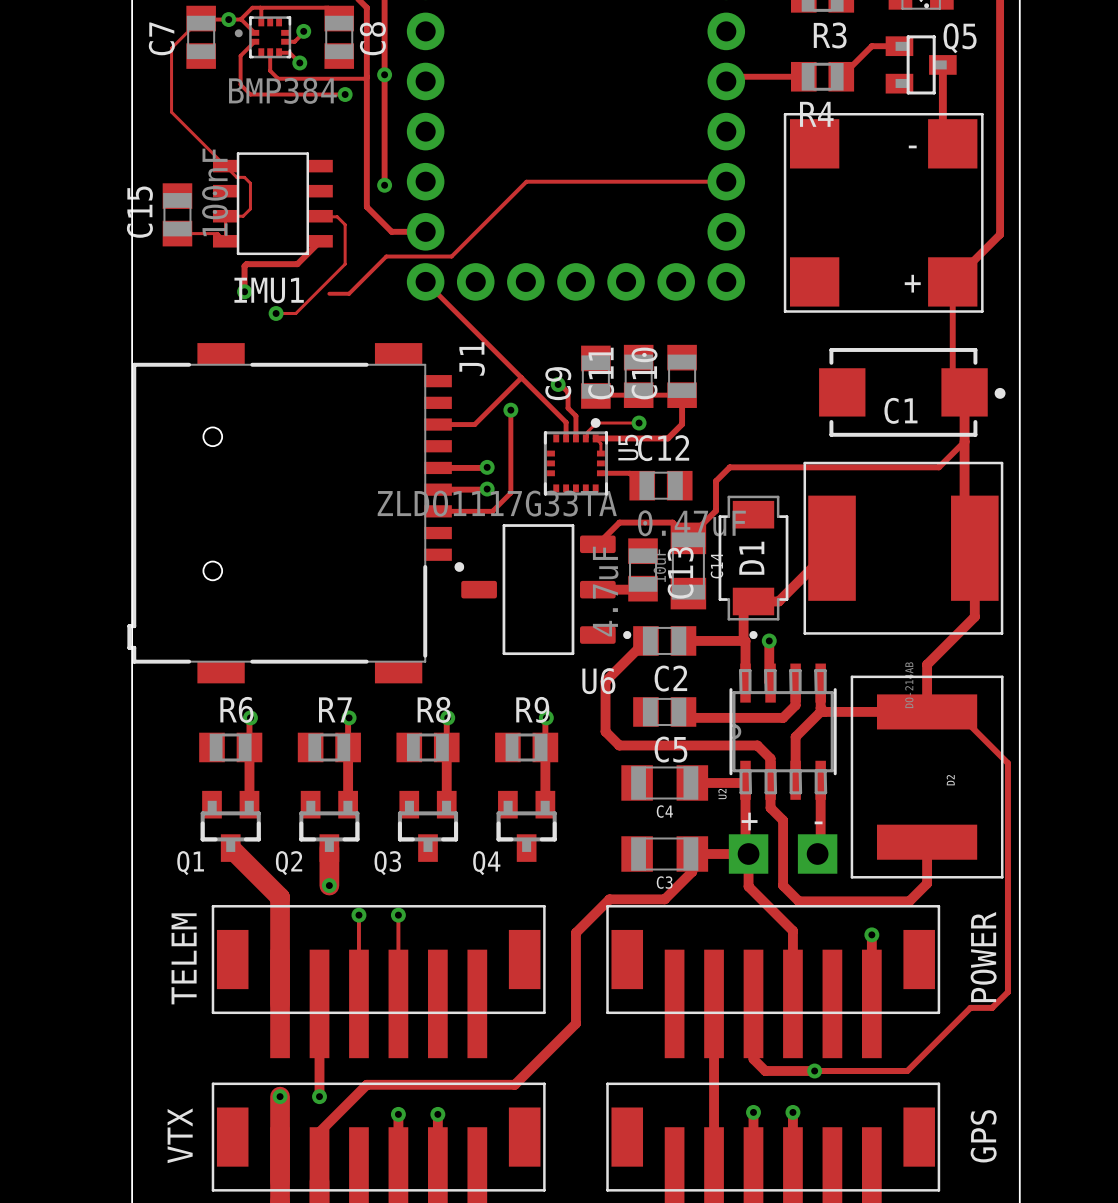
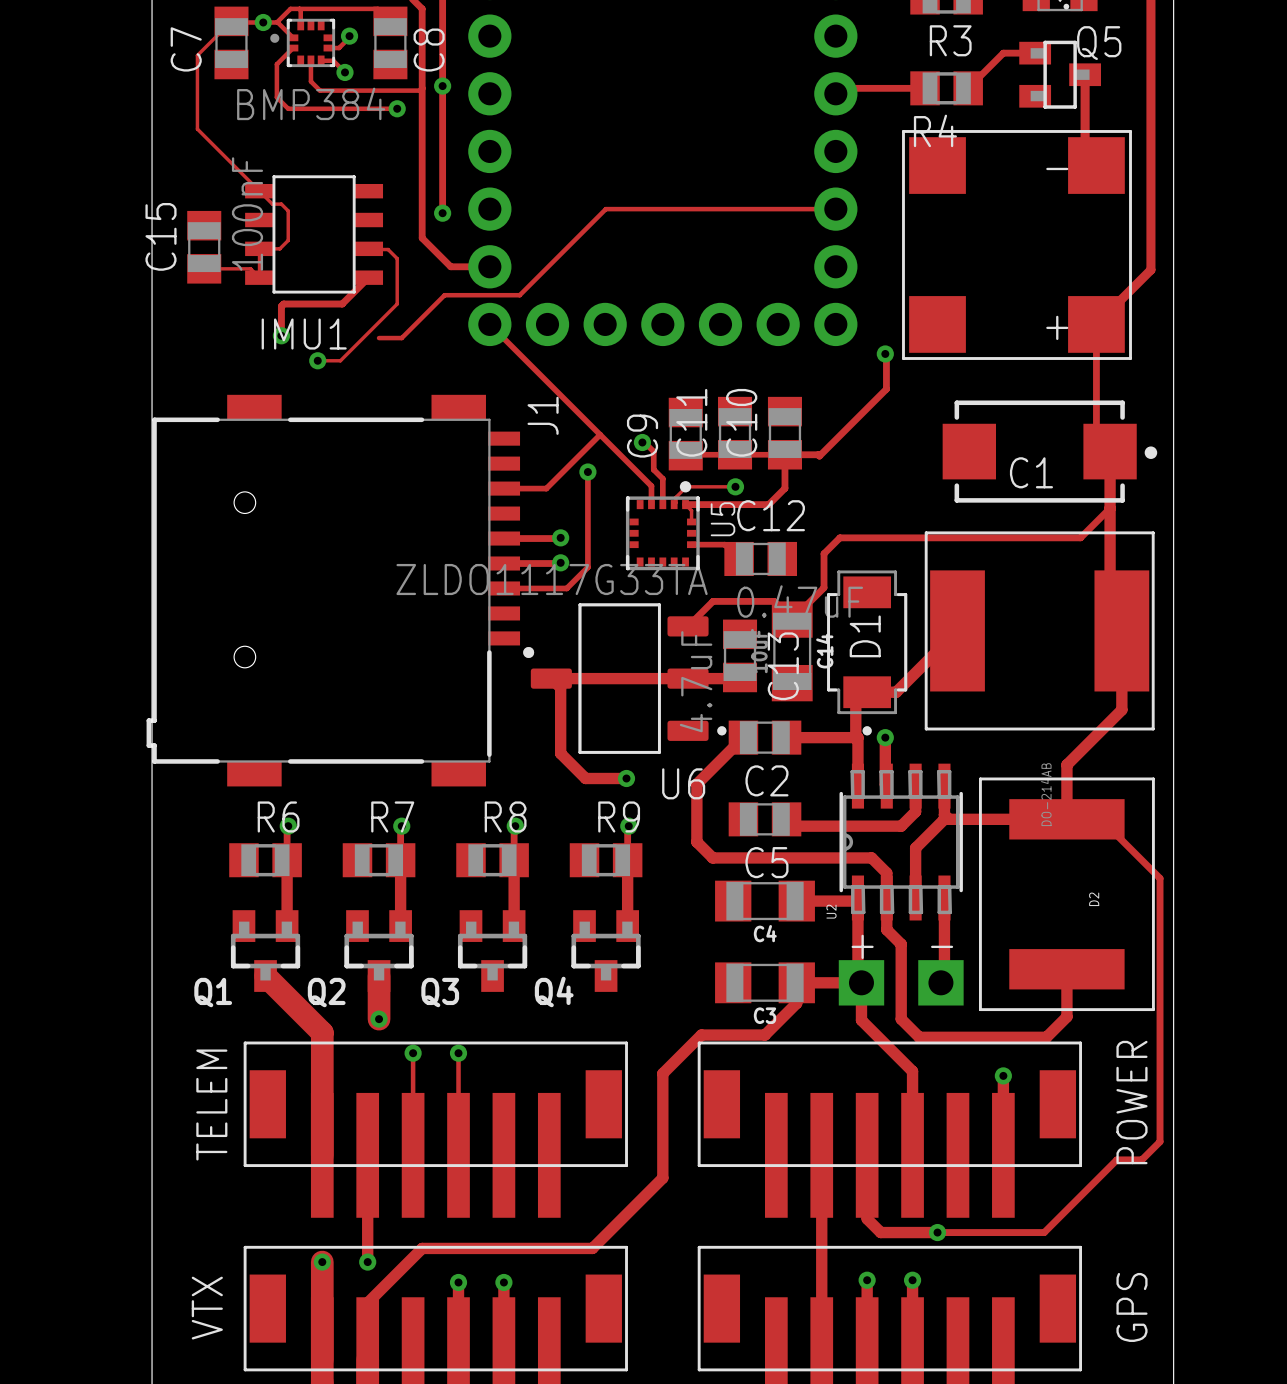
track: none -> (885, 353) (886, 389) (819, 456) (784, 454)
via: none -> (885, 353)
track: none -> (688, 678) (551, 678) (560, 687) (560, 753) (585, 778) (626, 778)
via: none -> (626, 778)

